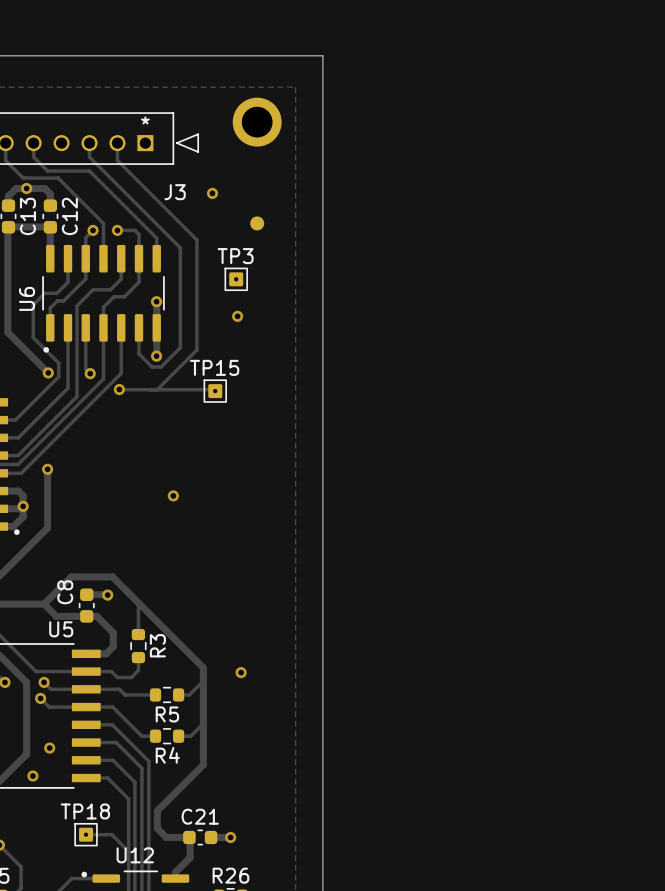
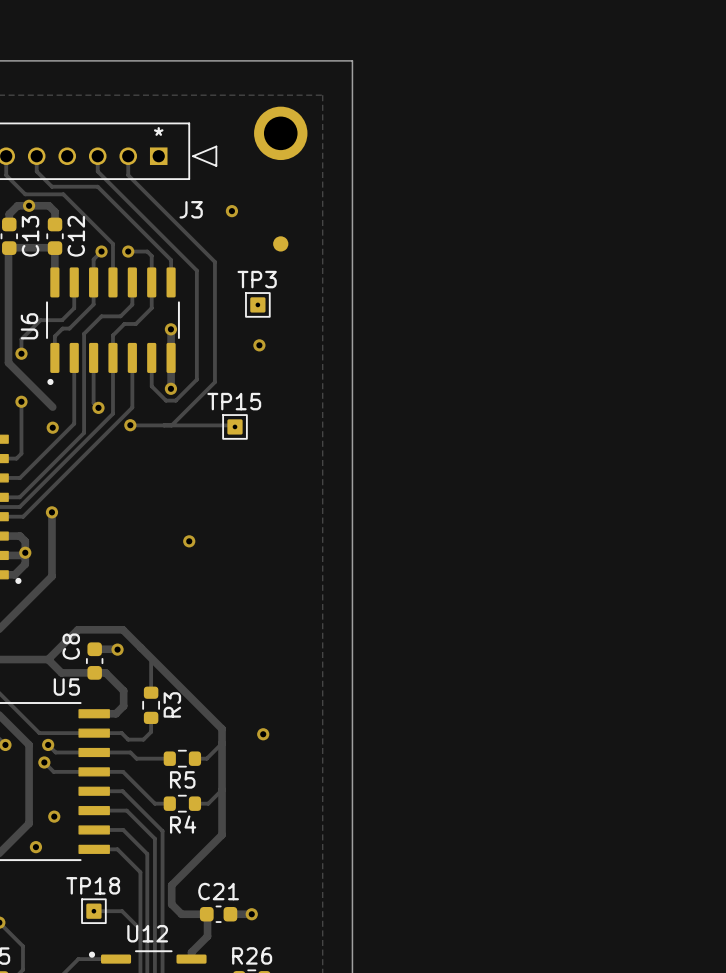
track: (44, 293) (33, 304) (33, 337) (58, 363) (58, 376) (15, 420) -> (21, 401) (21, 453) (16, 458)
track: none -> (48, 320) (40, 320) (21, 339) (21, 353)
via: none -> (21, 353)
via: none -> (21, 401)
via: (48, 372) -> none
via: none -> (52, 427)

